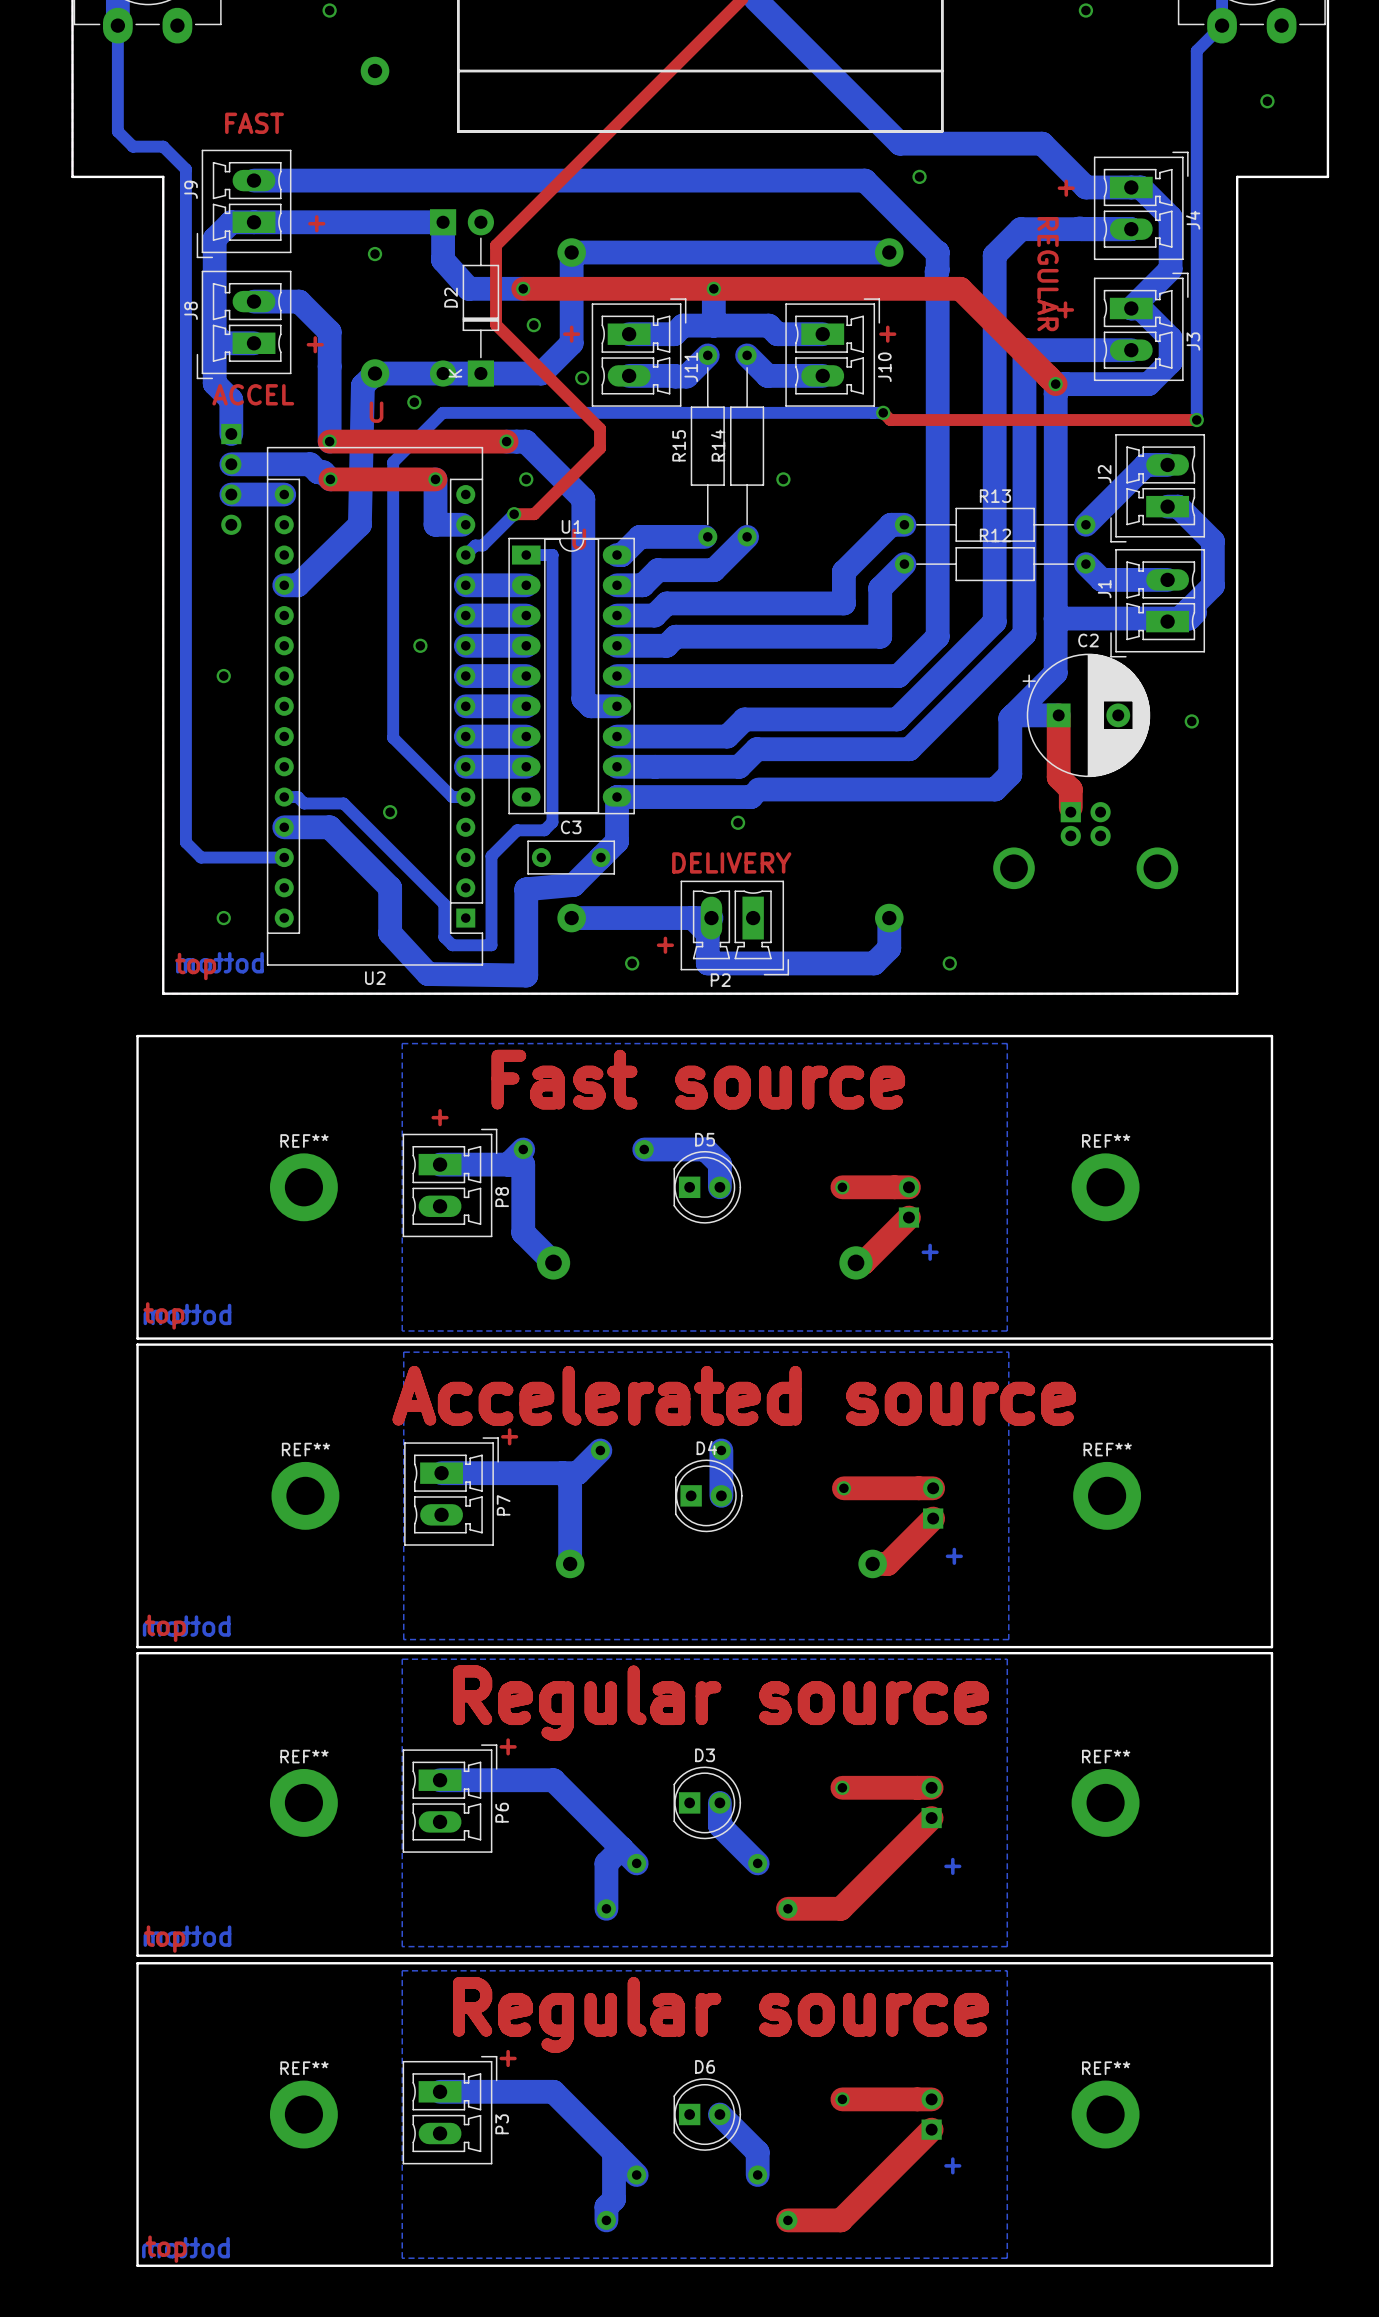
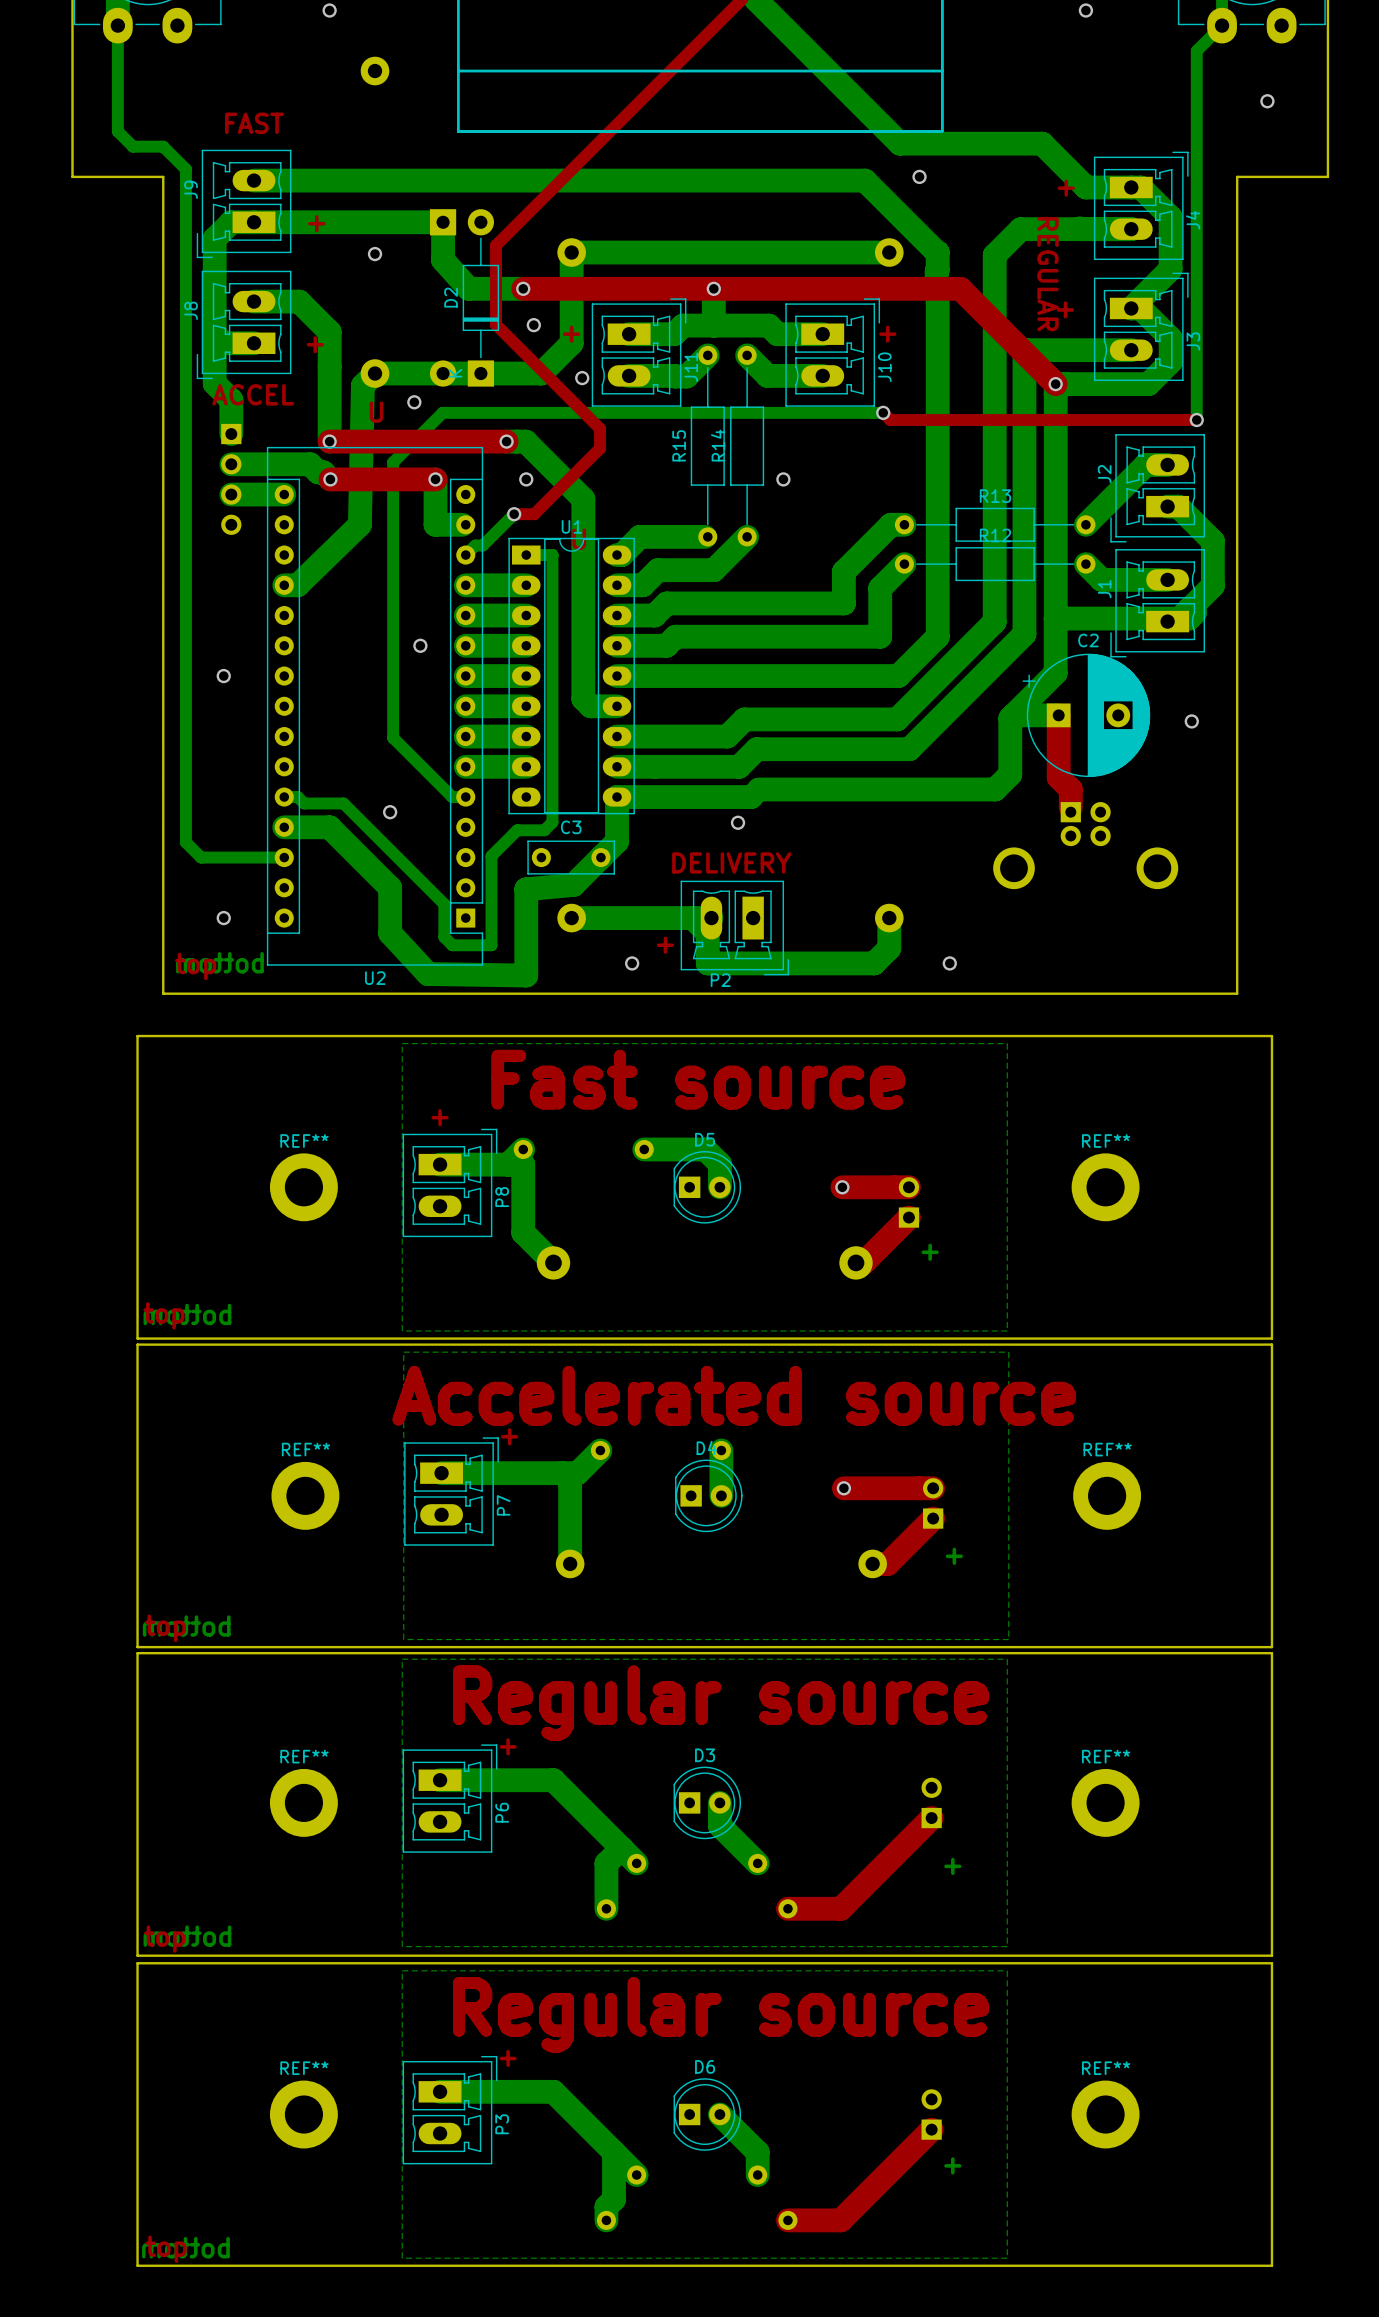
top track: (842, 1787) (931, 1787) -> none
via: (842, 1787) -> none
top track: (842, 2099) (931, 2099) -> none
via: (842, 2099) -> none

